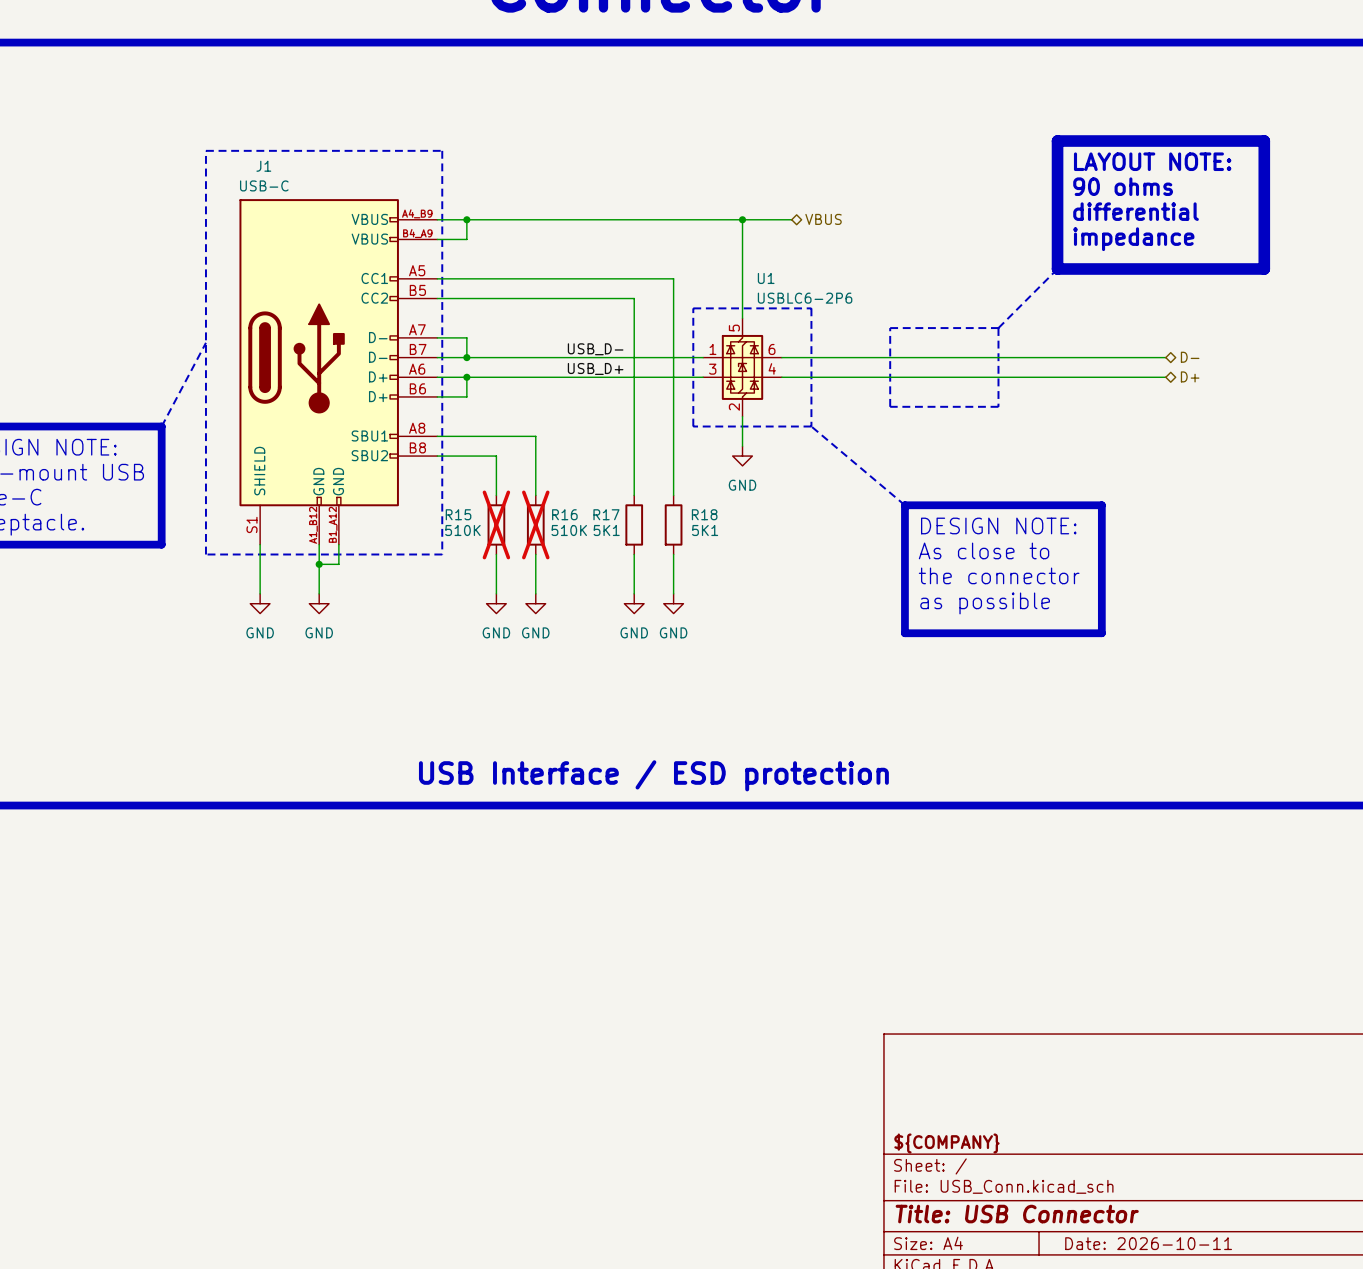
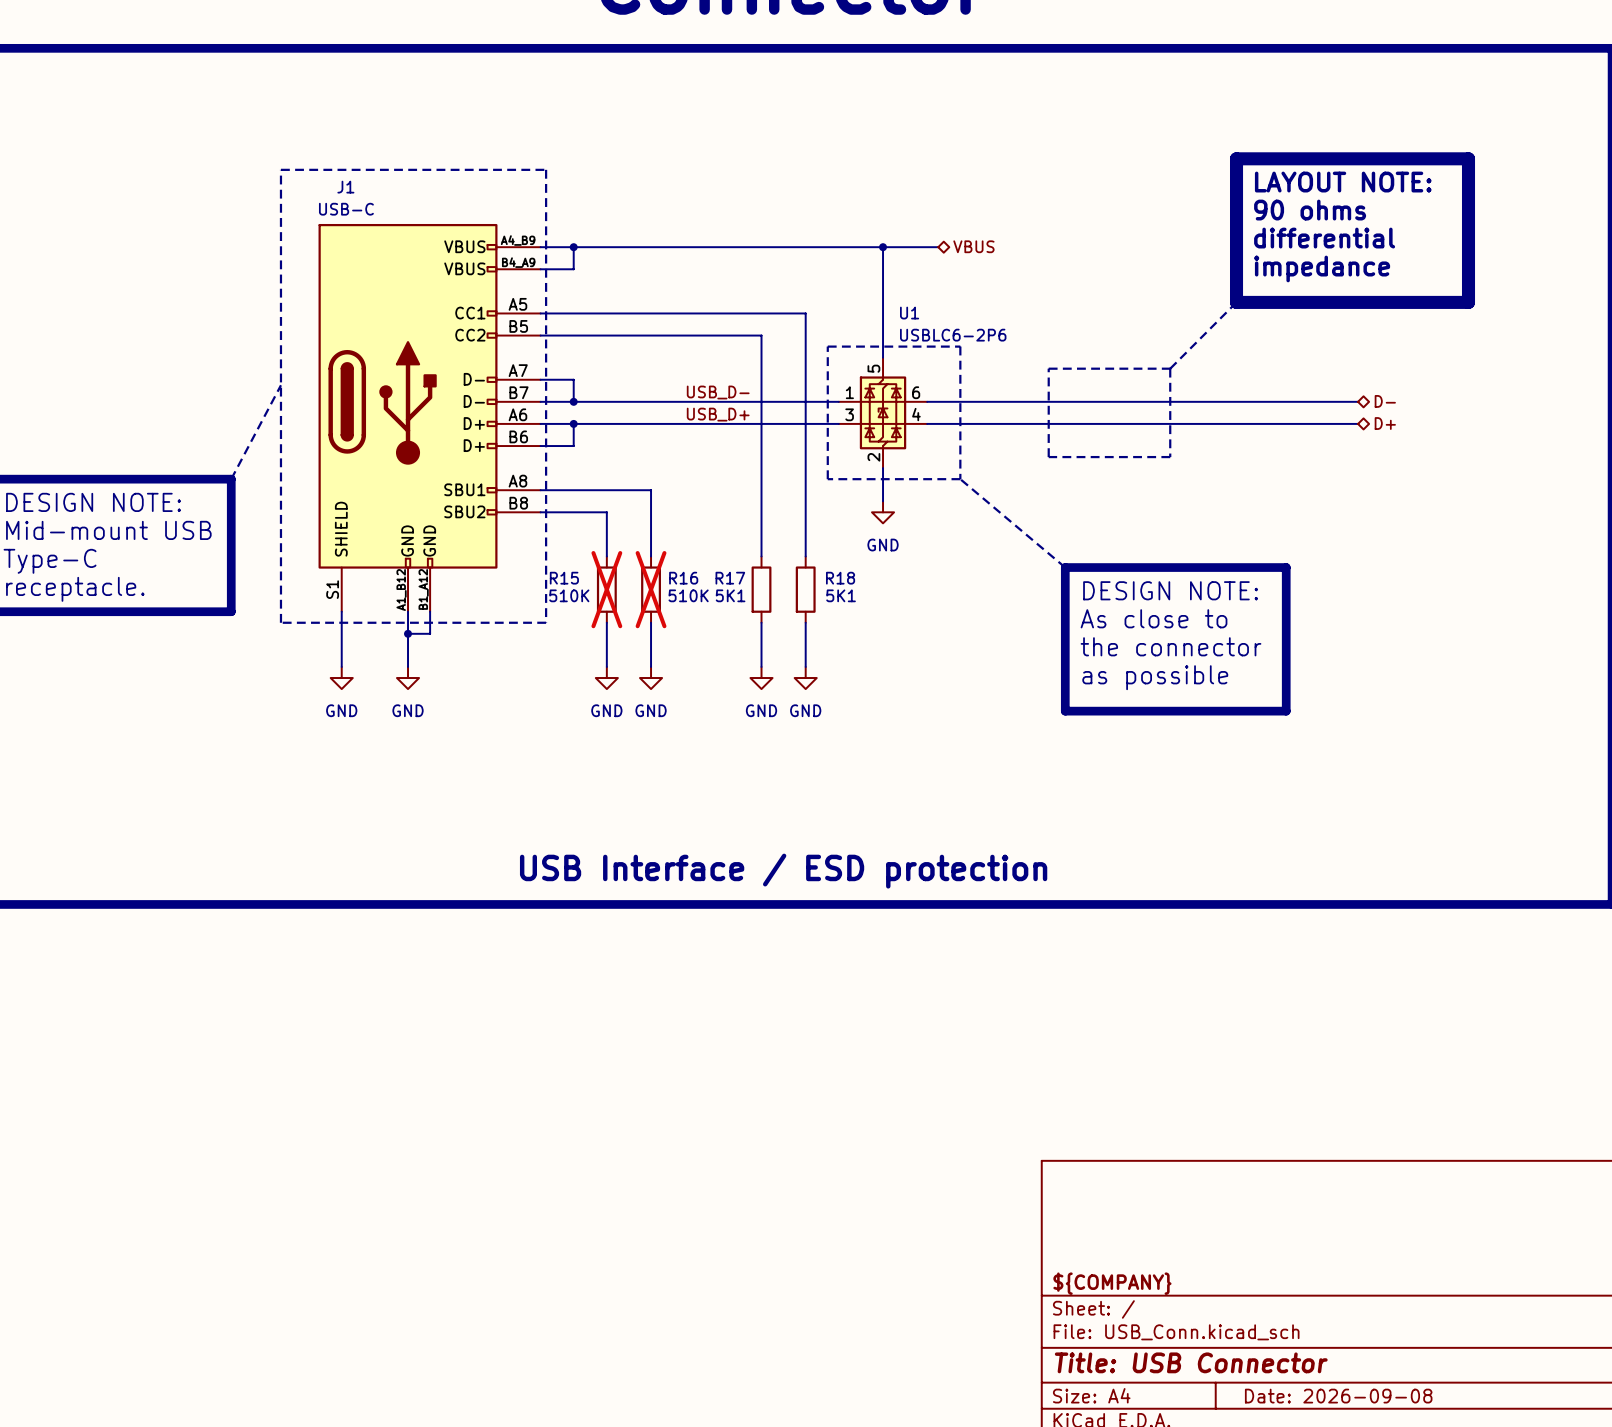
title block: Date: 2026-10-11 (1148, 1243) -> Date: 2026-09-08 (1338, 1396)

